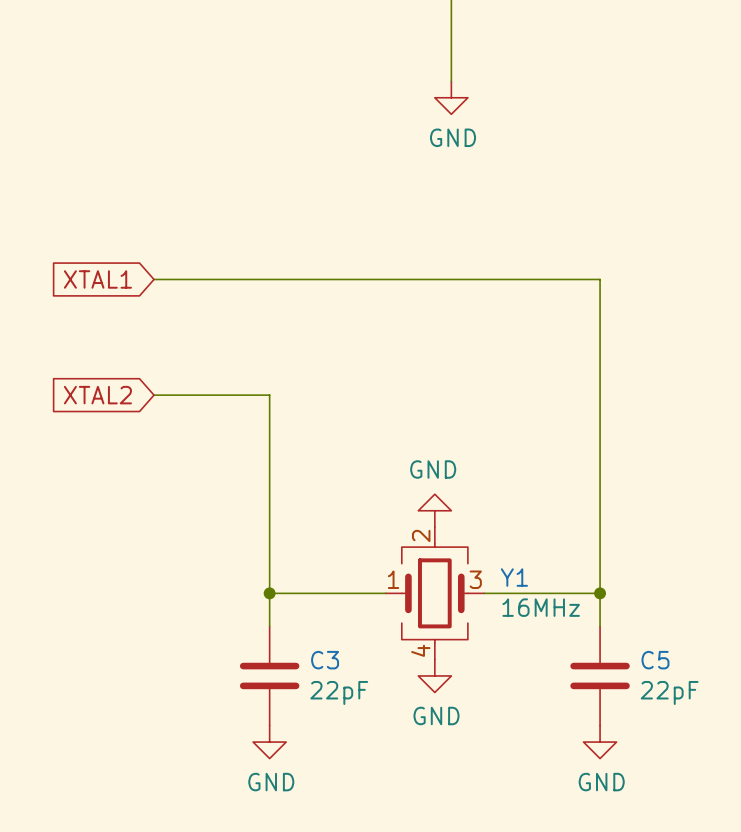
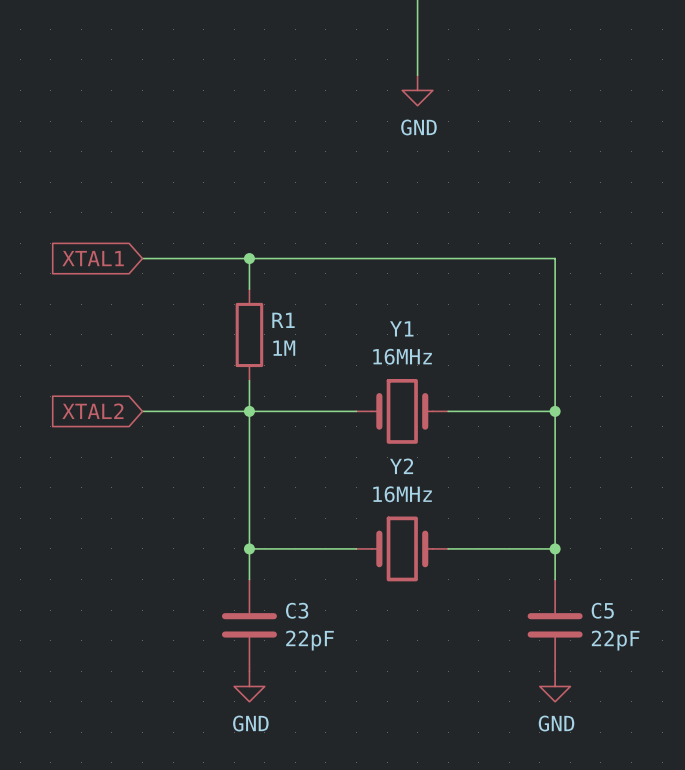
wire: none -> (249, 258) (249, 289)
junction: none -> (249, 258)
R1: none -> 1M (249, 334)
global label position: XTAL2 (97, 395) -> XTAL2 (92, 411)
wire: (154, 395) (269, 395) (269, 411) -> none
wire: none -> (142, 411) (356, 411)
junction: none -> (249, 411)
wire: none -> (448, 411) (555, 411)
junction: none -> (555, 411)
power symbol: GND (434, 510) -> none
Y1 symbol: [385, 527, 485, 660] -> [356, 378, 449, 444]
Y1 name position: Y1 (514, 577) -> Y1 (401, 328)
Y2: none -> 16MHz (402, 548)
Y1 value position: 16MHz (541, 607) -> 16MHz (402, 356)
power symbol: GND (434, 675) -> none

